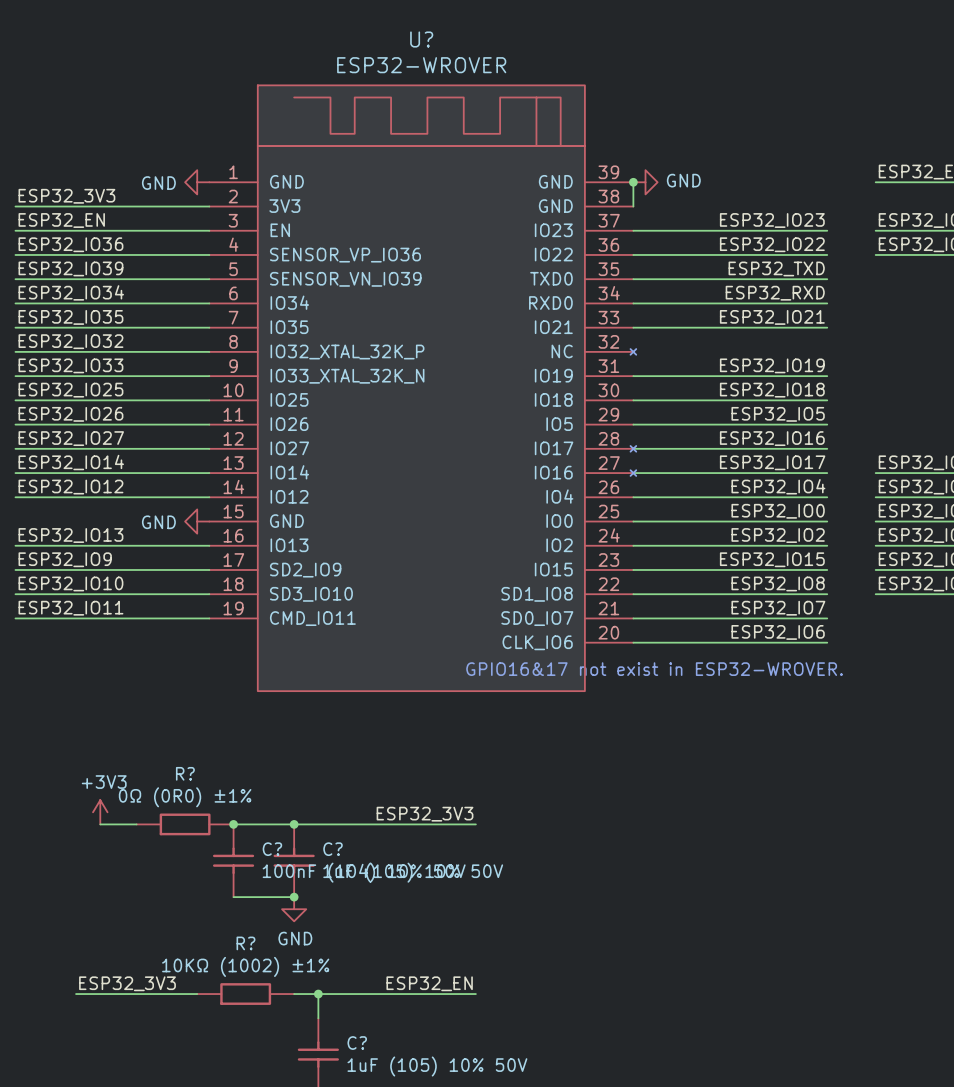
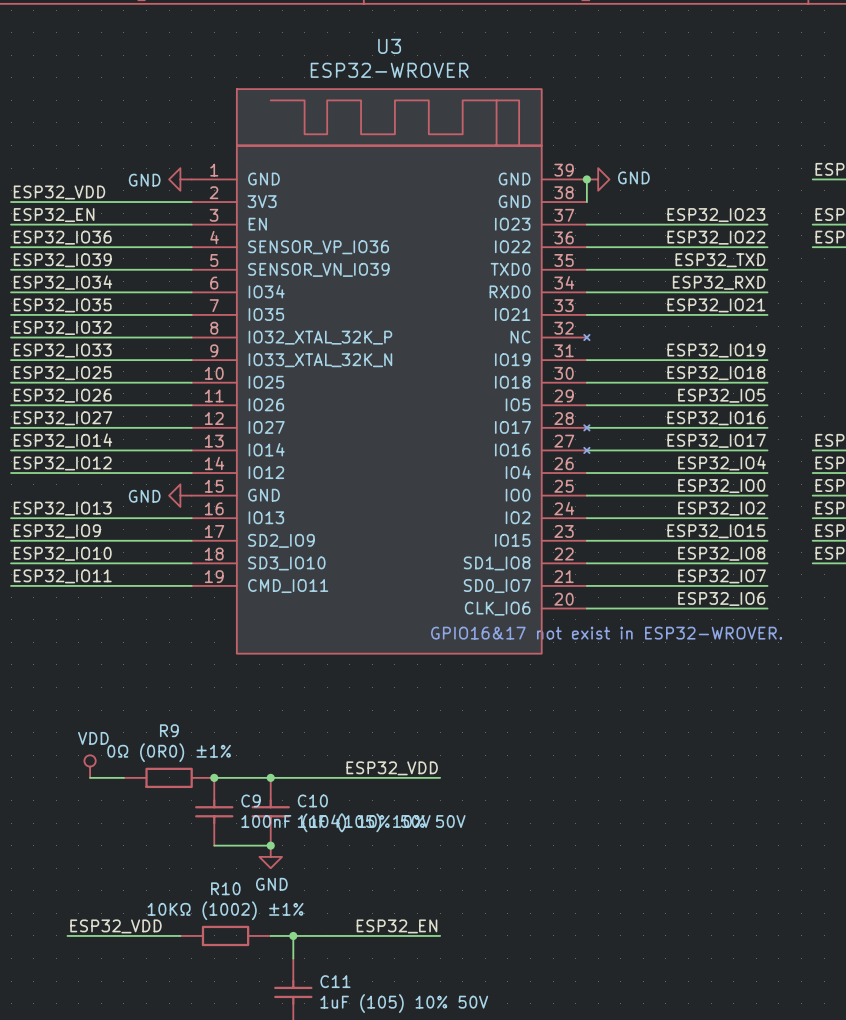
U? name: U? (421, 39) -> U3 (389, 46)
label: ESP32_3V3 (66, 196) -> ESP32_VDD (59, 192)
R? name: R? (185, 773) -> R9 (169, 730)
power symbol: +3V3 (100, 812) -> VDD (90, 766)
label: ESP32_3V3 (425, 814) -> ESP32_VDD (392, 768)
C? name: C? (272, 849) -> C9 (251, 800)
C? name: C? (333, 849) -> C10 (312, 800)
R? name: R? (245, 943) -> R10 (225, 888)
label: ESP32_3V3 (127, 983) -> ESP32_VDD (115, 926)
C? name: C? (357, 1043) -> C11 (335, 981)

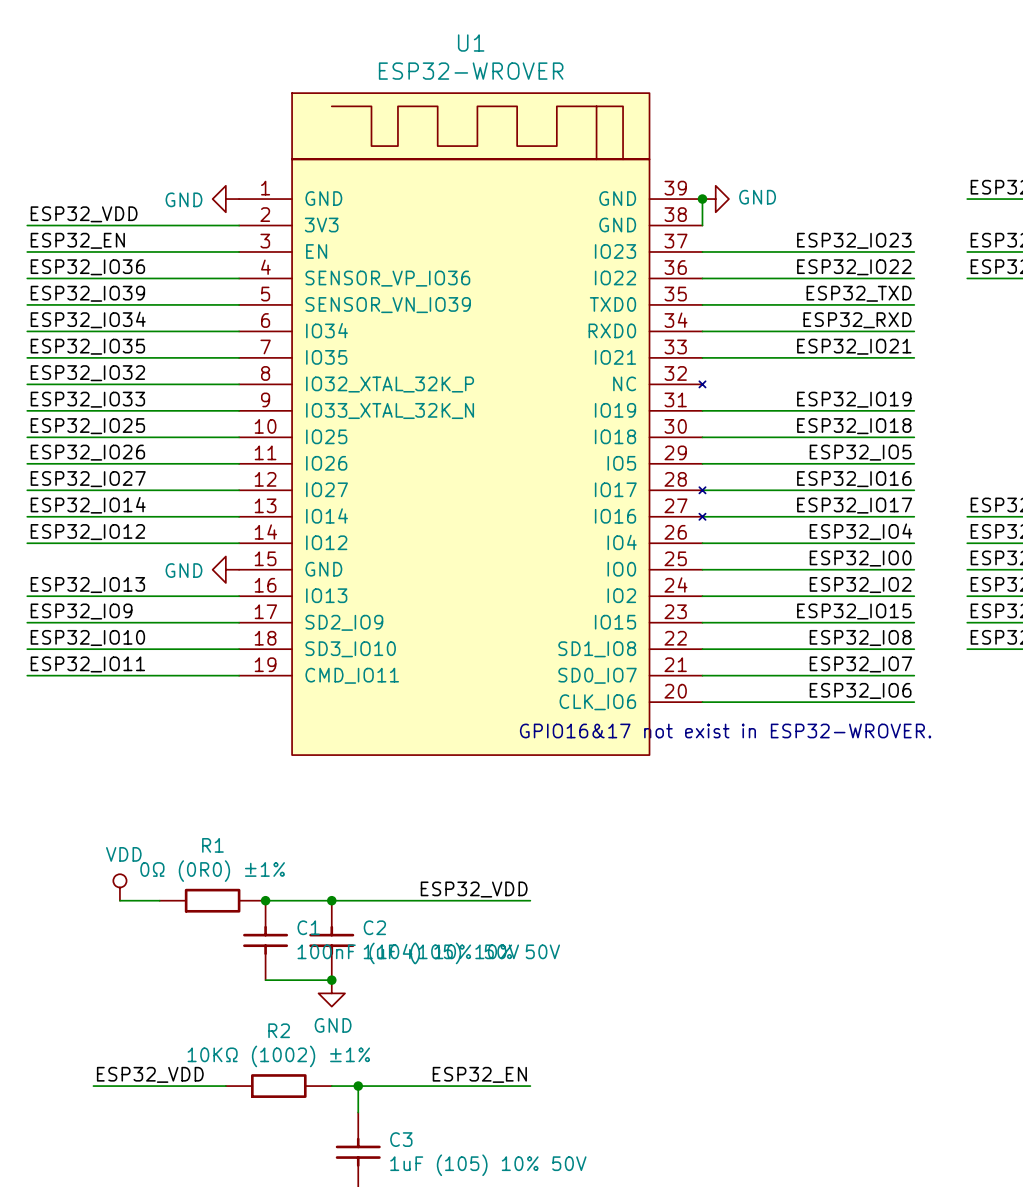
U3 name: U3 (389, 46) -> U1 (471, 43)
R9 name: R9 (169, 730) -> R1 (212, 845)
C9 name: C9 (251, 800) -> C1 (308, 927)
C10 name: C10 (312, 800) -> C2 (374, 927)
R10 name: R10 (225, 888) -> R2 (279, 1030)
C11 name: C11 (335, 981) -> C3 (401, 1139)

